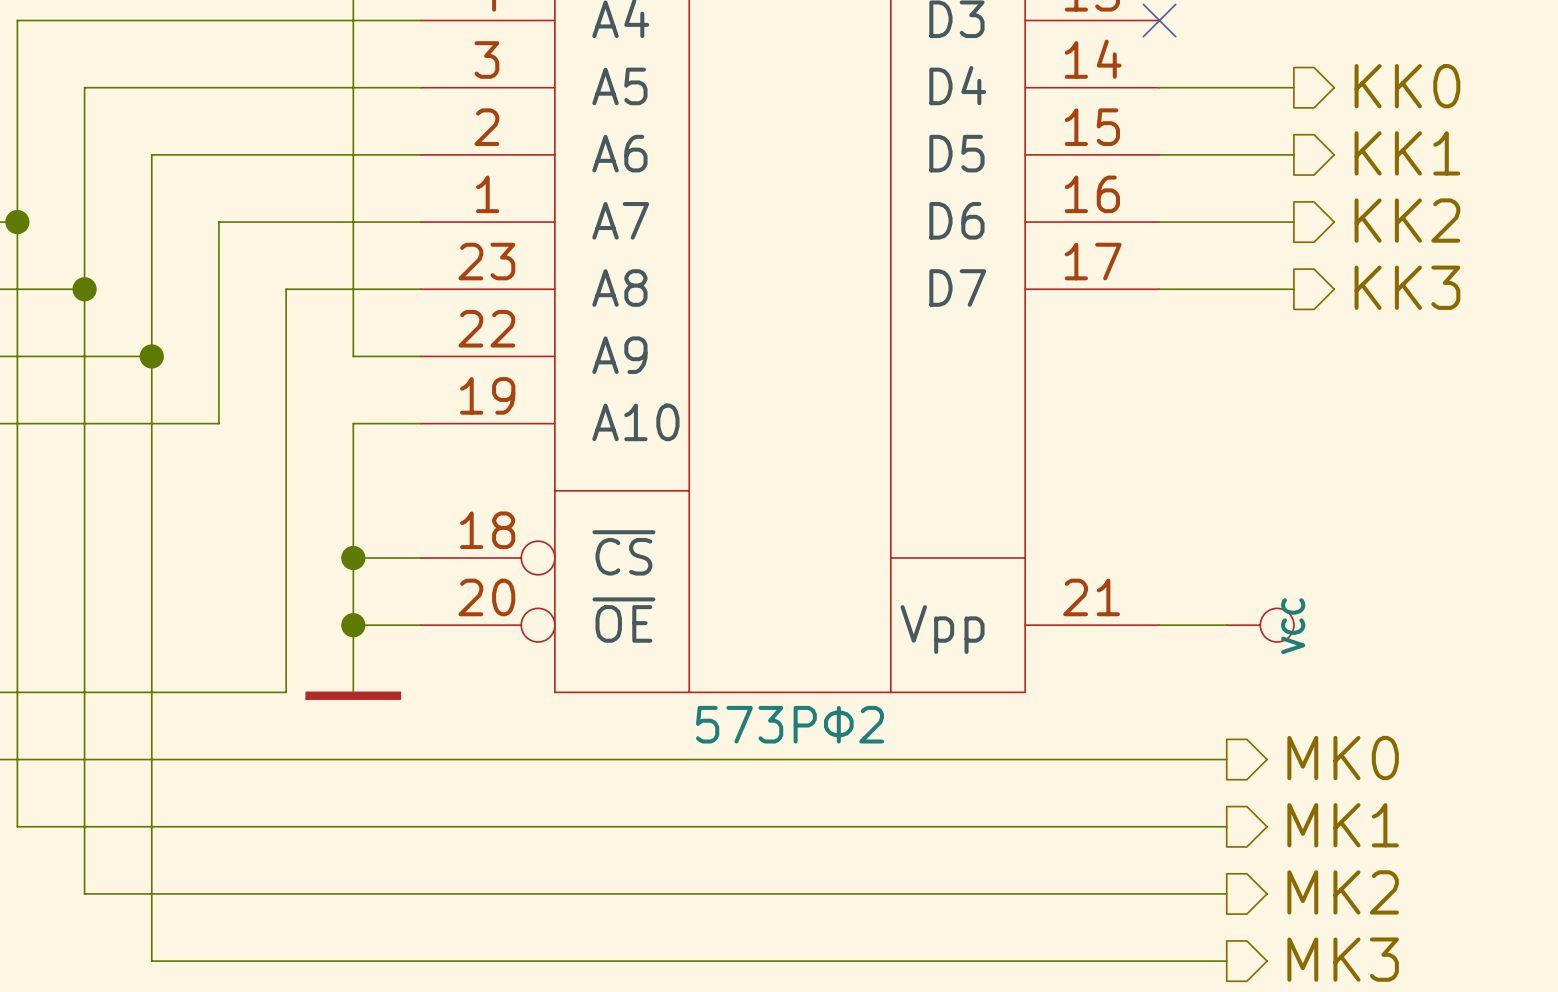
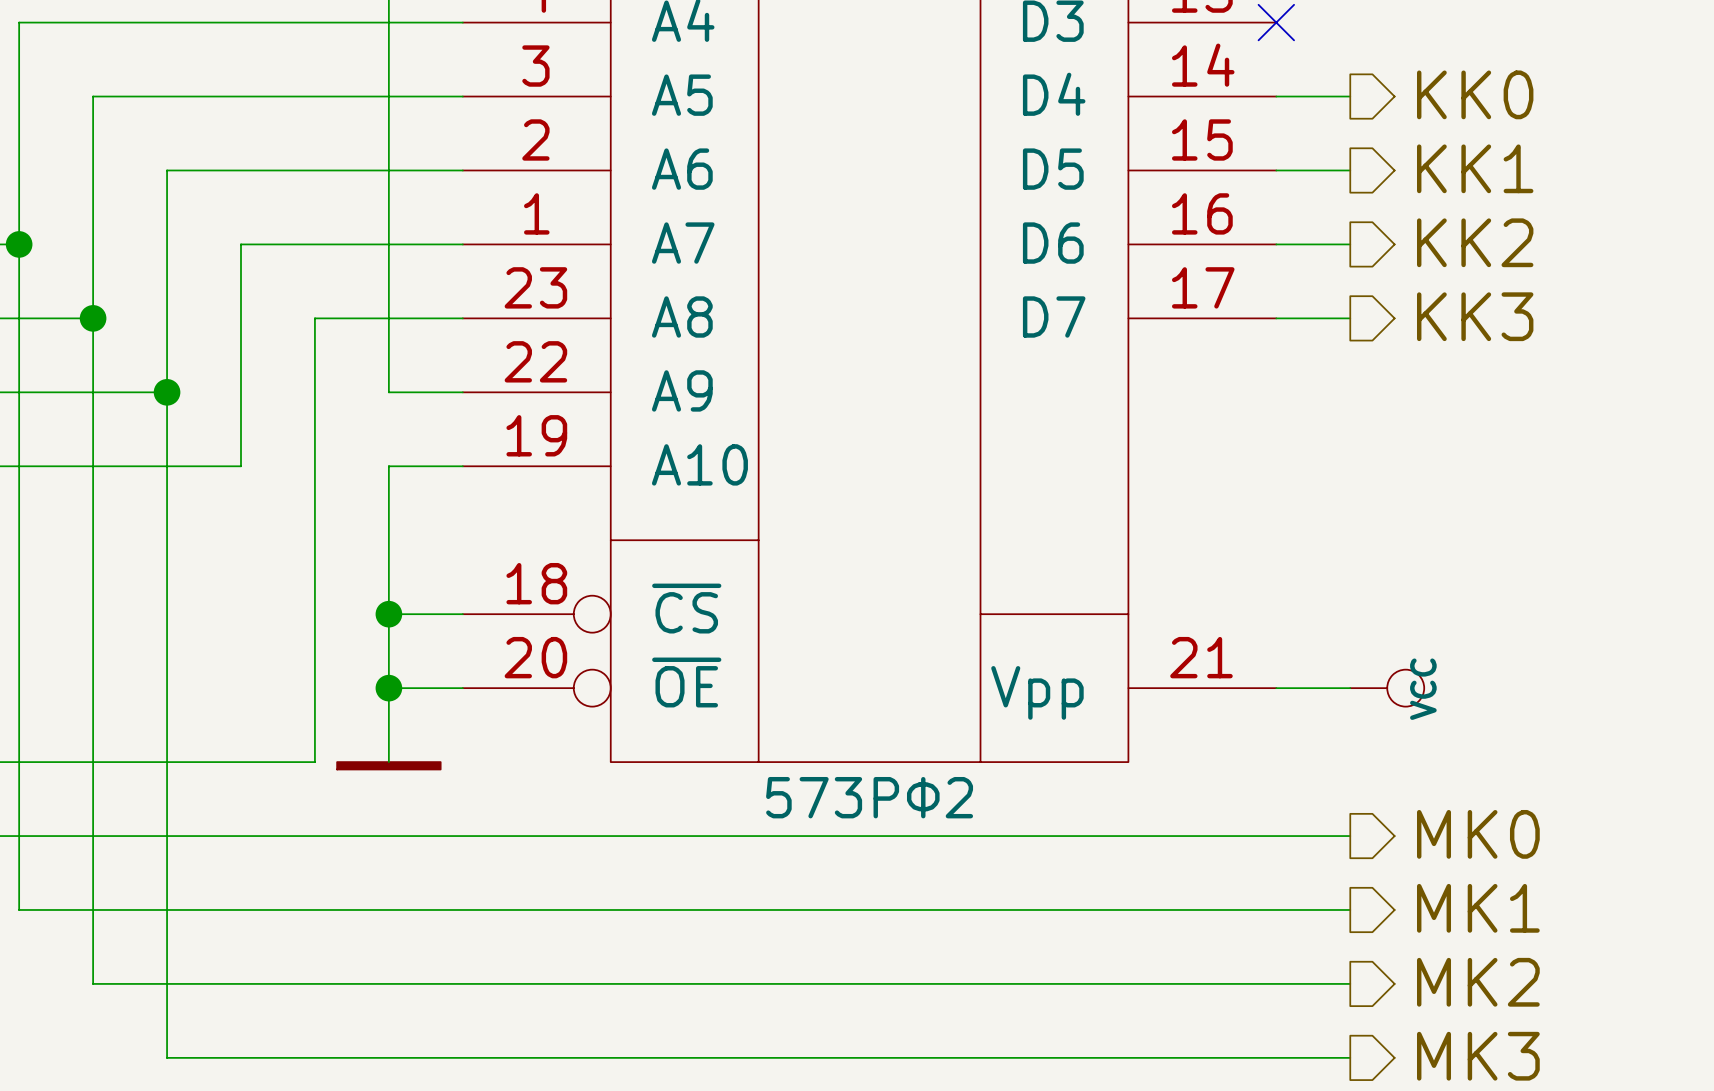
hierarchical label position: KK0 (1407, 86) -> KK0 (1475, 94)
wire: (1226, 87) (1293, 87) -> none
hierarchical label position: KK1 (1407, 153) -> KK1 (1475, 168)
wire: (1226, 154) (1293, 154) -> none
hierarchical label position: KK2 (1407, 220) -> KK2 (1475, 242)
wire: (1226, 222) (1293, 222) -> none
hierarchical label position: KK3 (1407, 287) -> KK3 (1475, 316)
wire: (1226, 289) (1293, 289) -> none

